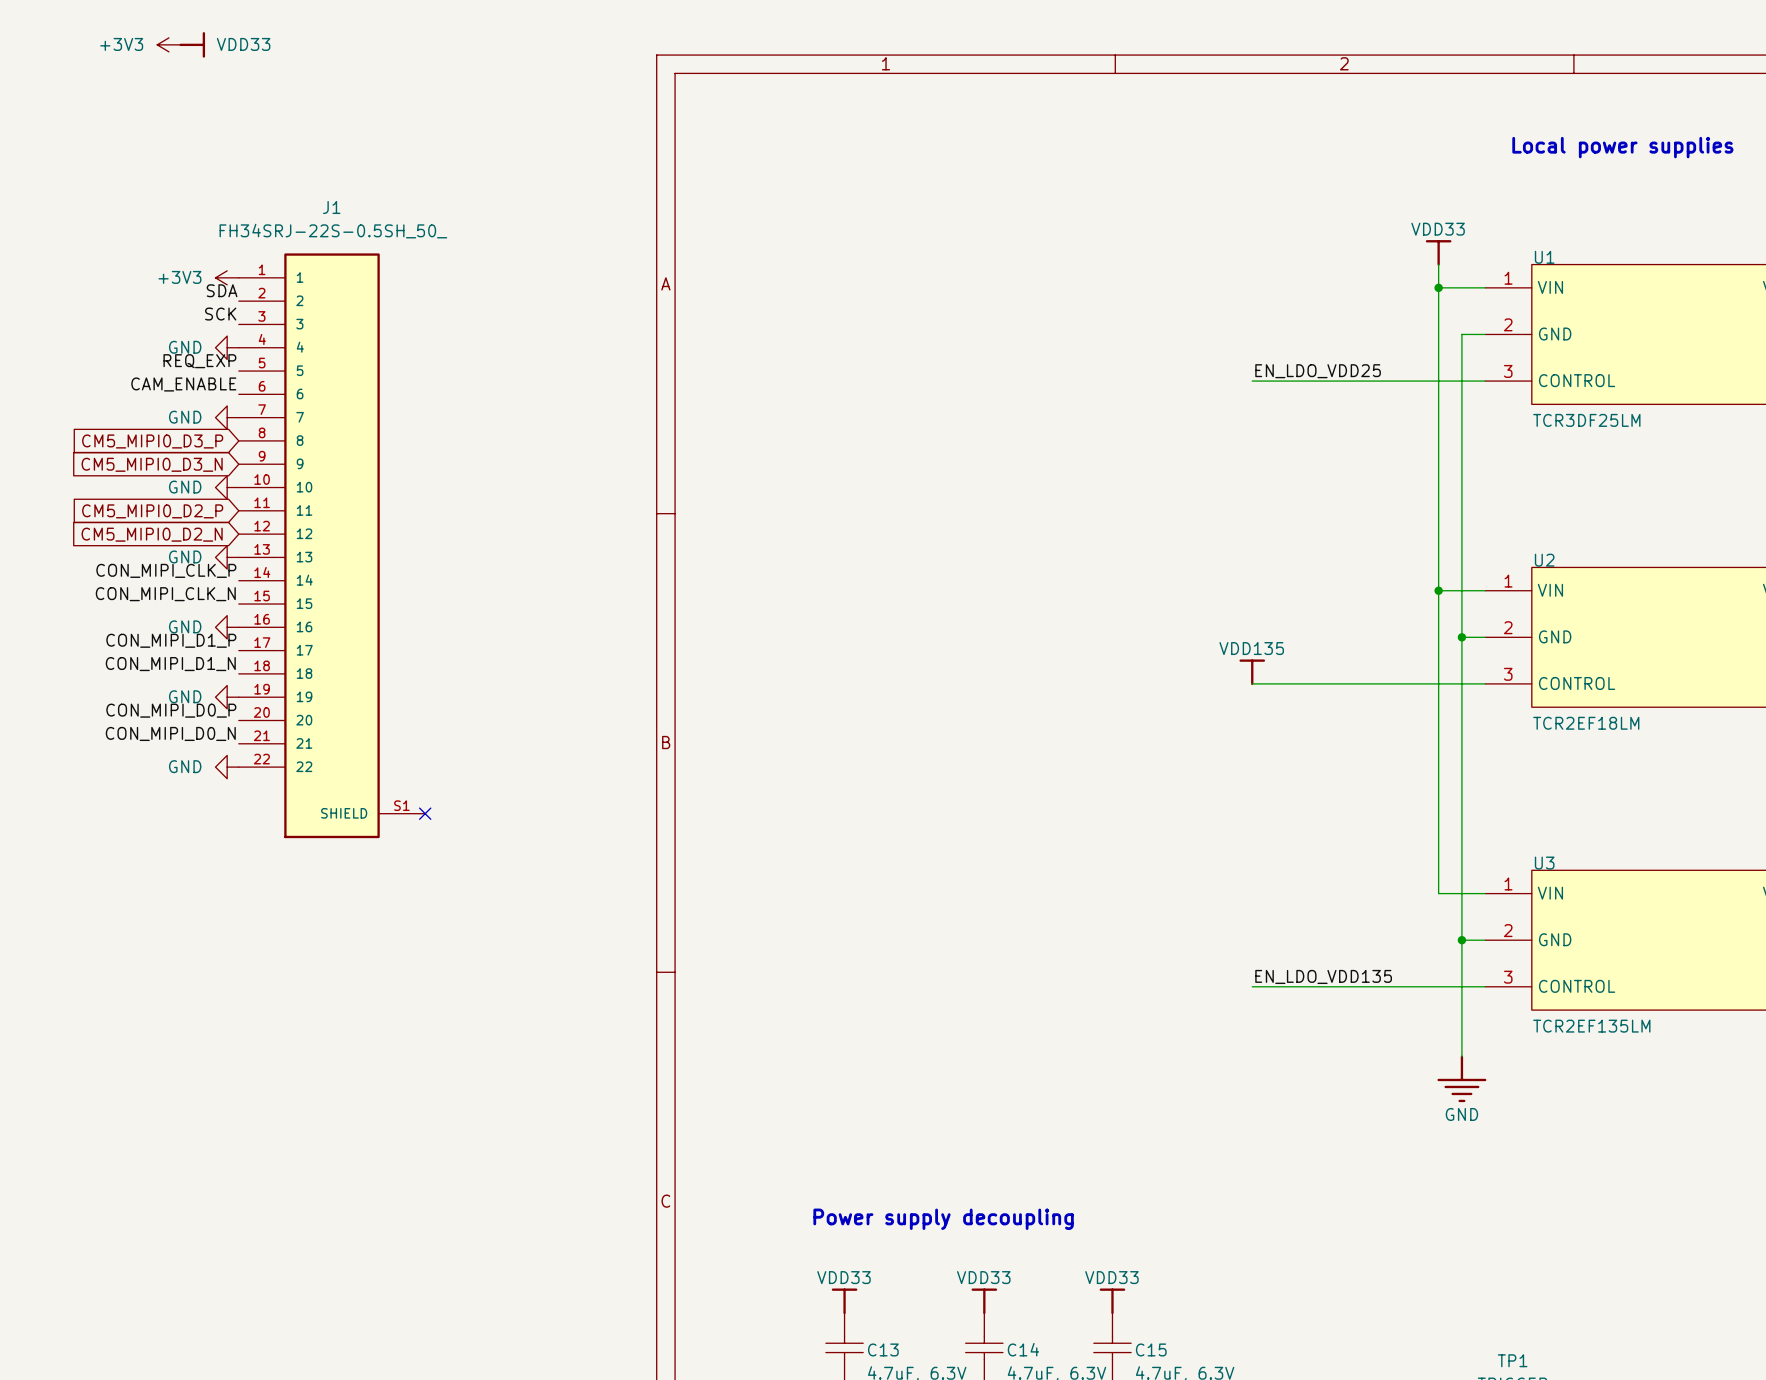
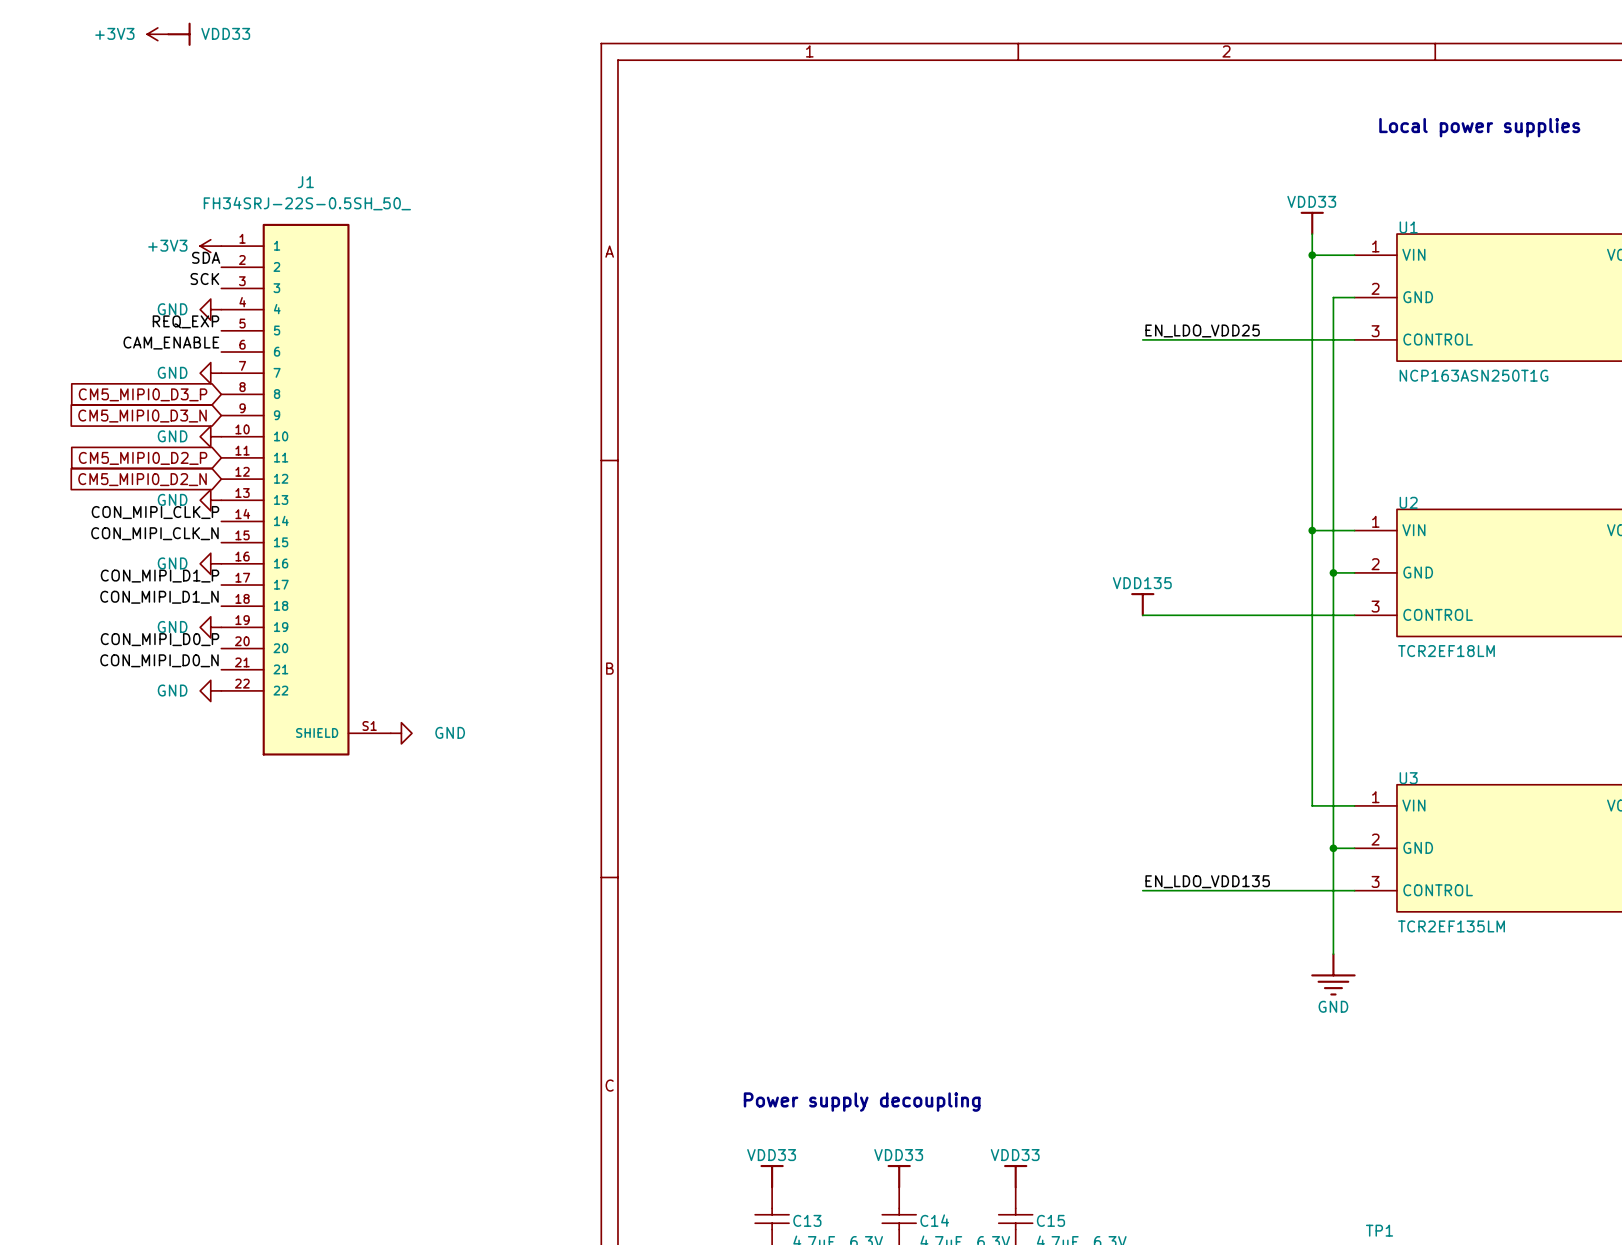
U1 value: TCR3DF25LM (1586, 420) -> NCP163ASN250T1G (1473, 375)
no-connect mark: (425, 813) -> none
power symbol: none -> GND (401, 733)

